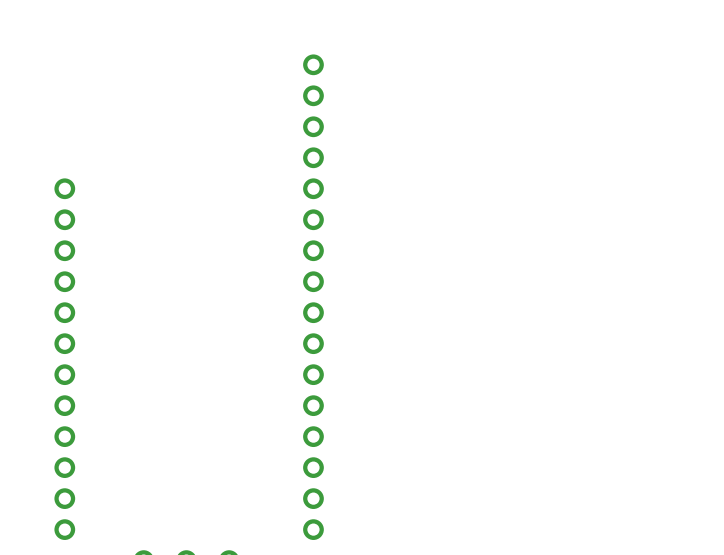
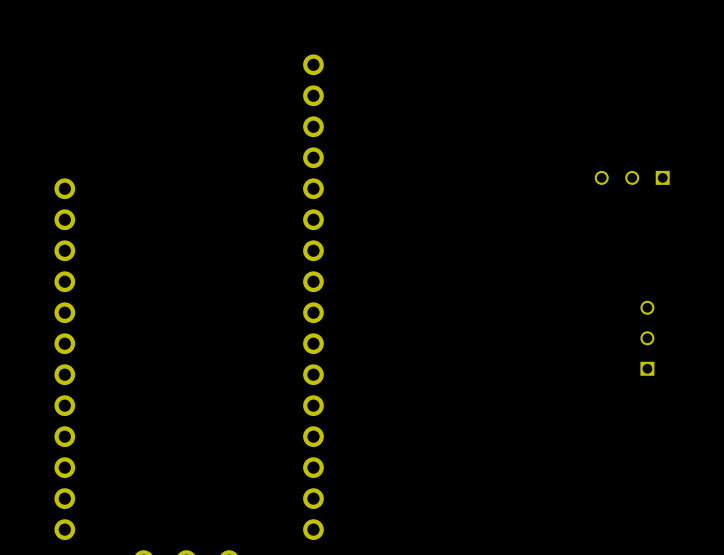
part: none -> (632, 177)
part: none -> (647, 338)

